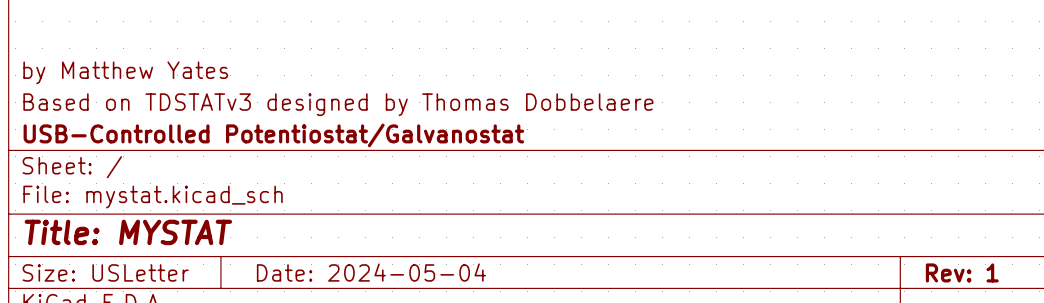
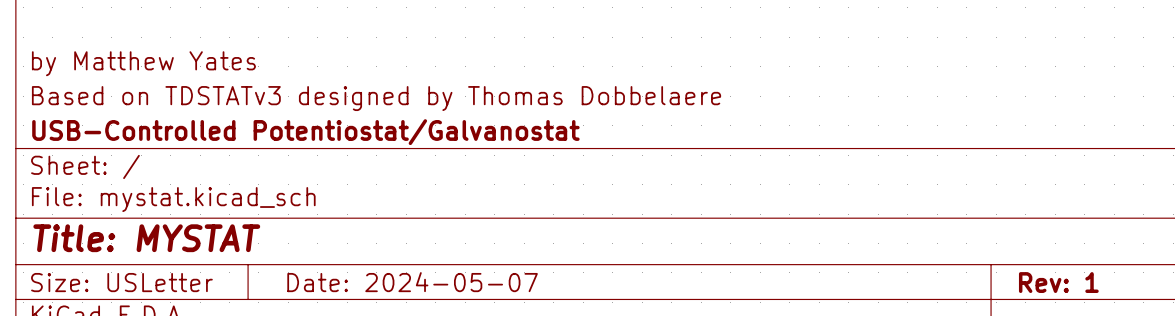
title block: Date: 2024-05-04 (371, 272) -> Date: 2024-05-07 (412, 282)

